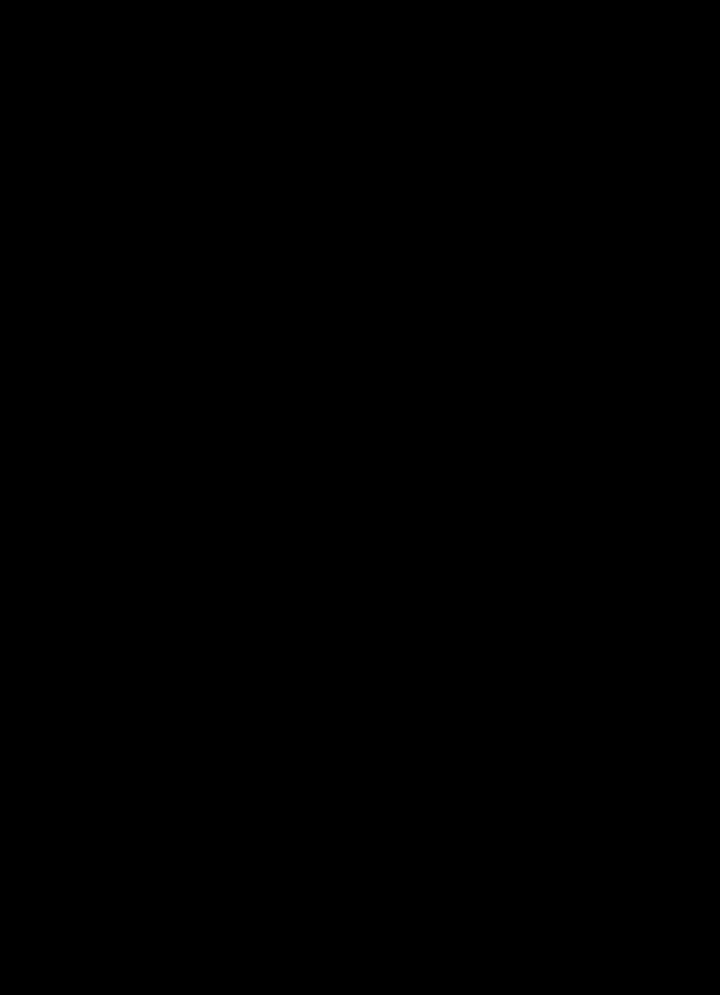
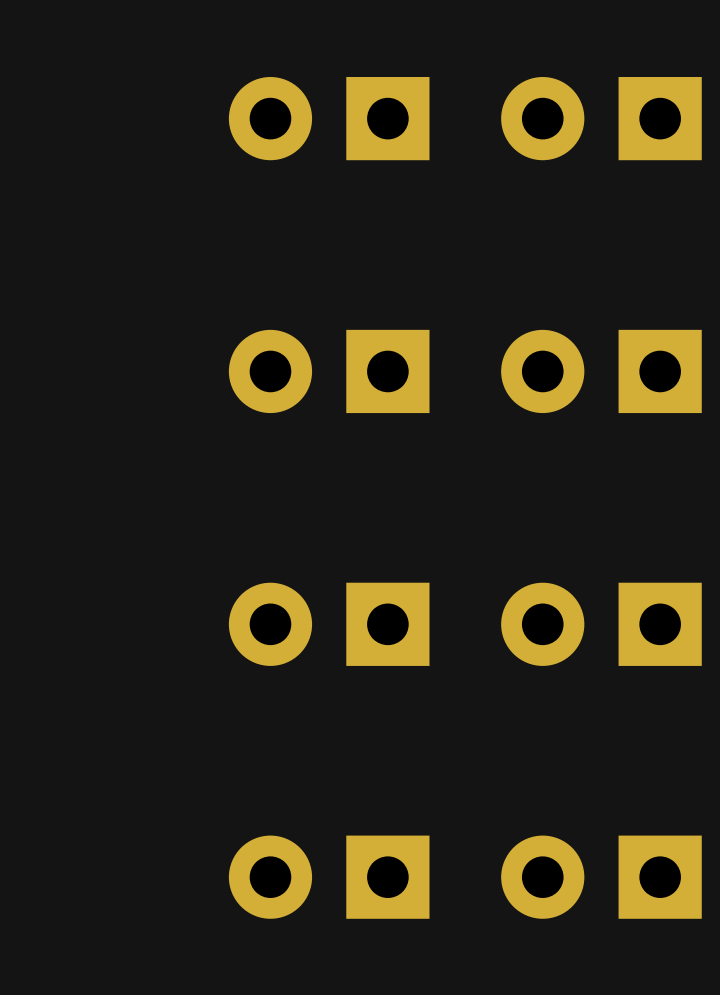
part: none -> (329, 118)
part: none -> (601, 118)
part: none -> (329, 371)
part: none -> (601, 371)
part: none -> (329, 624)
part: none -> (601, 624)
part: none -> (329, 877)
part: none -> (601, 877)

